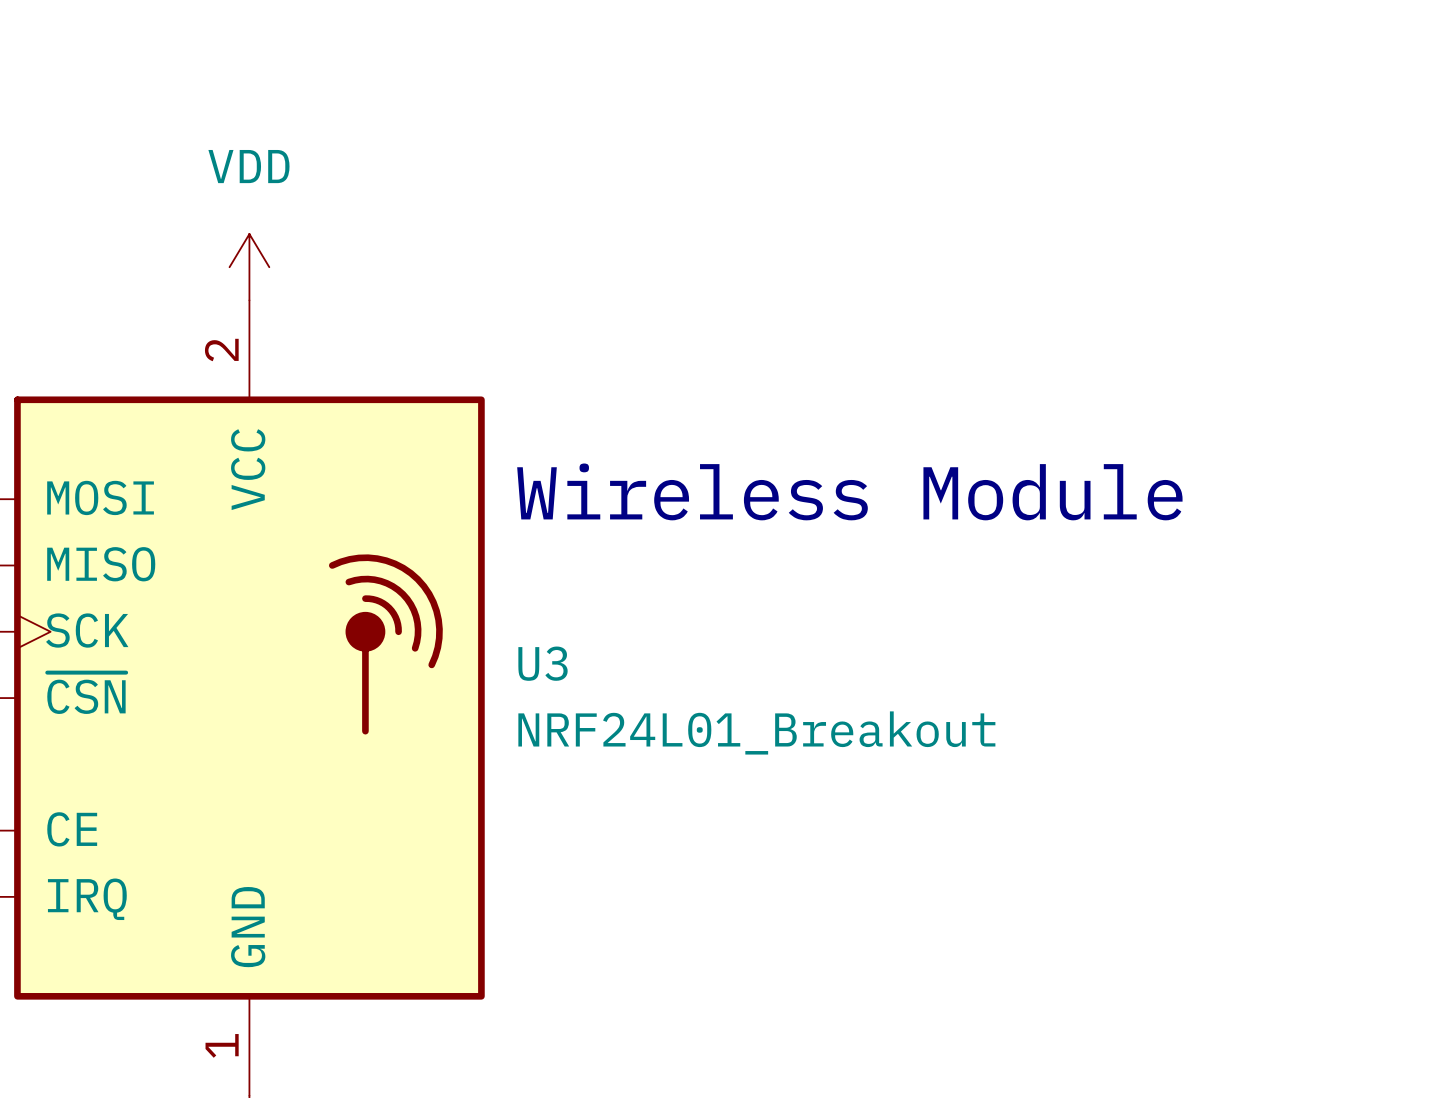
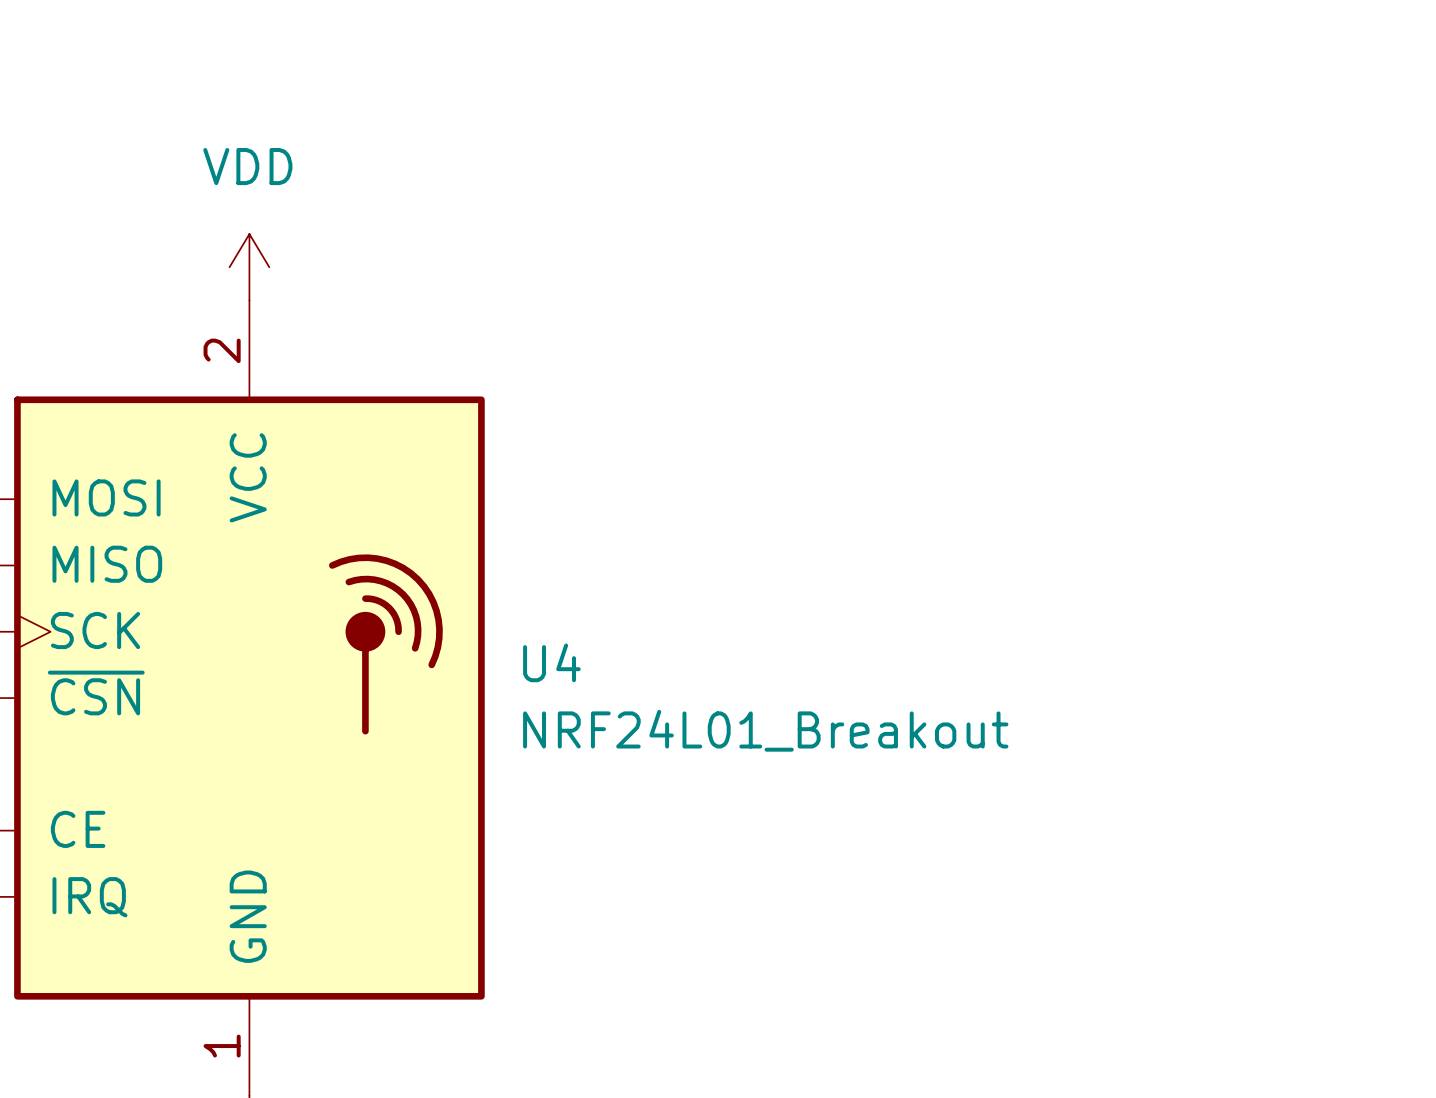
text: Wireless Module (849, 491) -> none
U3 name: U3 (543, 663) -> U4 (551, 662)

